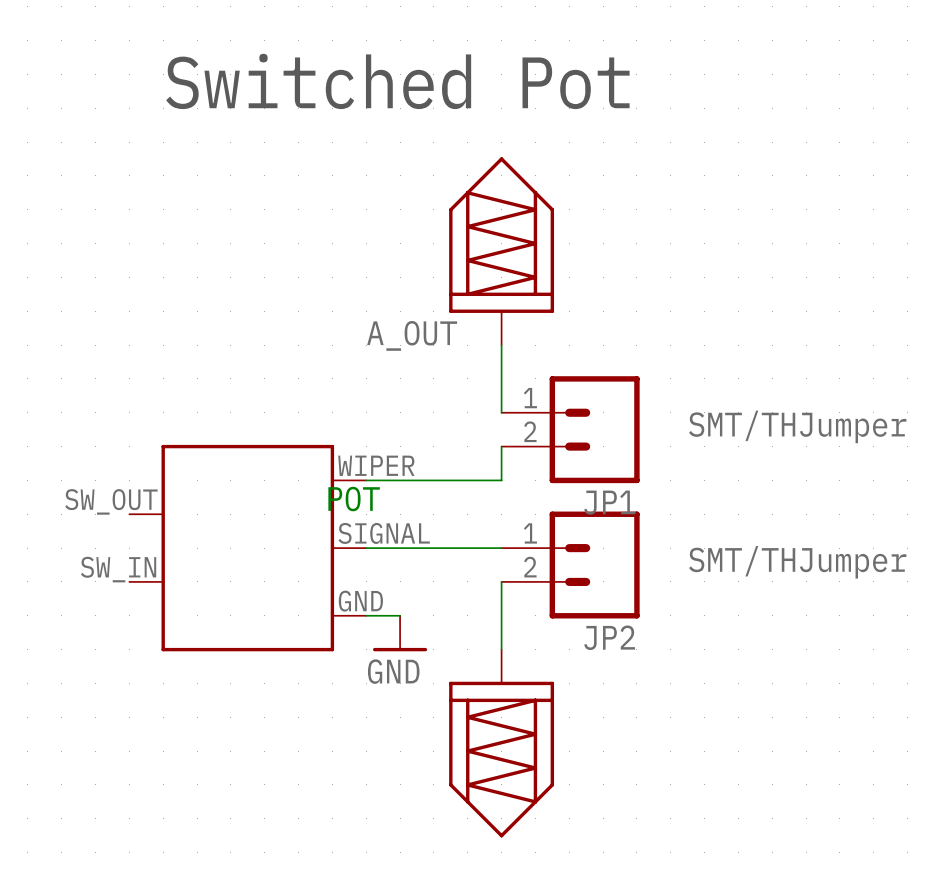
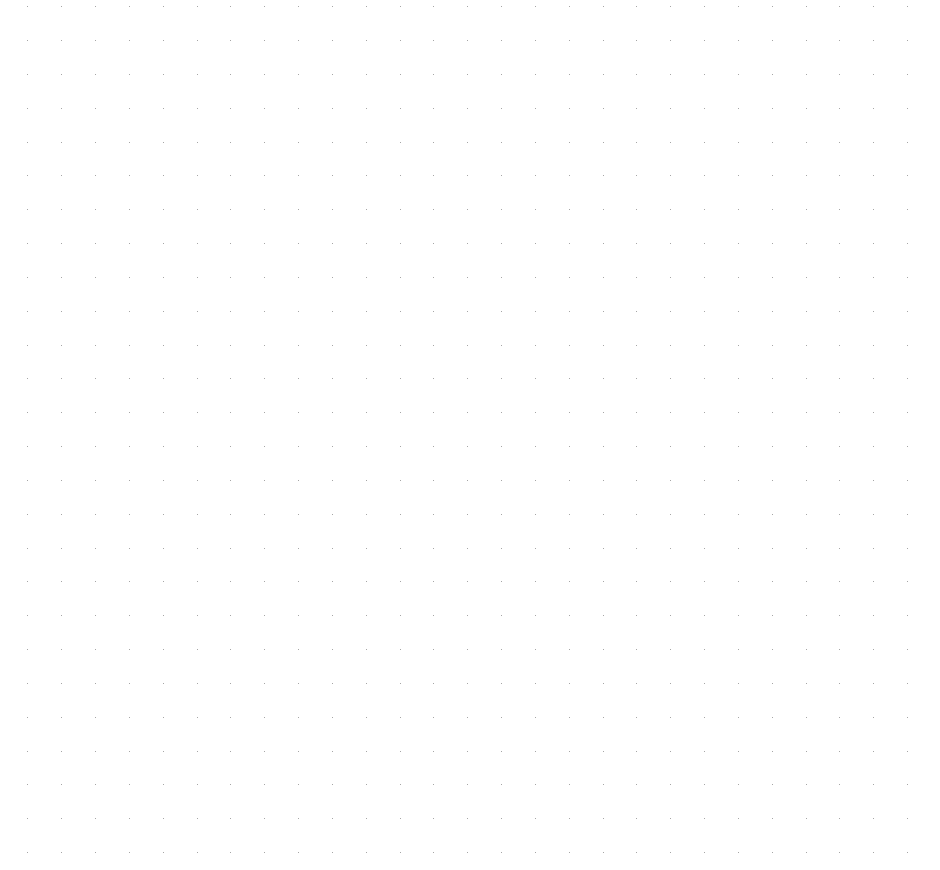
text: Switched Pot (397, 81) -> none
part: (501, 251) -> none
label: A_OUT (412, 335) -> none
wire: (501, 345) (501, 412) -> none
JP1: SMT/THJumper (570, 429) -> none
wire: (501, 446) (501, 480) (366, 480) -> none
text: POT (354, 499) -> none
part: (247, 548) -> none
wire: (366, 548) (501, 548) -> none
JP2: SMT/THJumper (570, 565) -> none
wire: (501, 581) (501, 649) -> none
wire: (366, 615) (400, 615) -> none
power symbol: GND (400, 633) -> none
part: (501, 743) -> none

